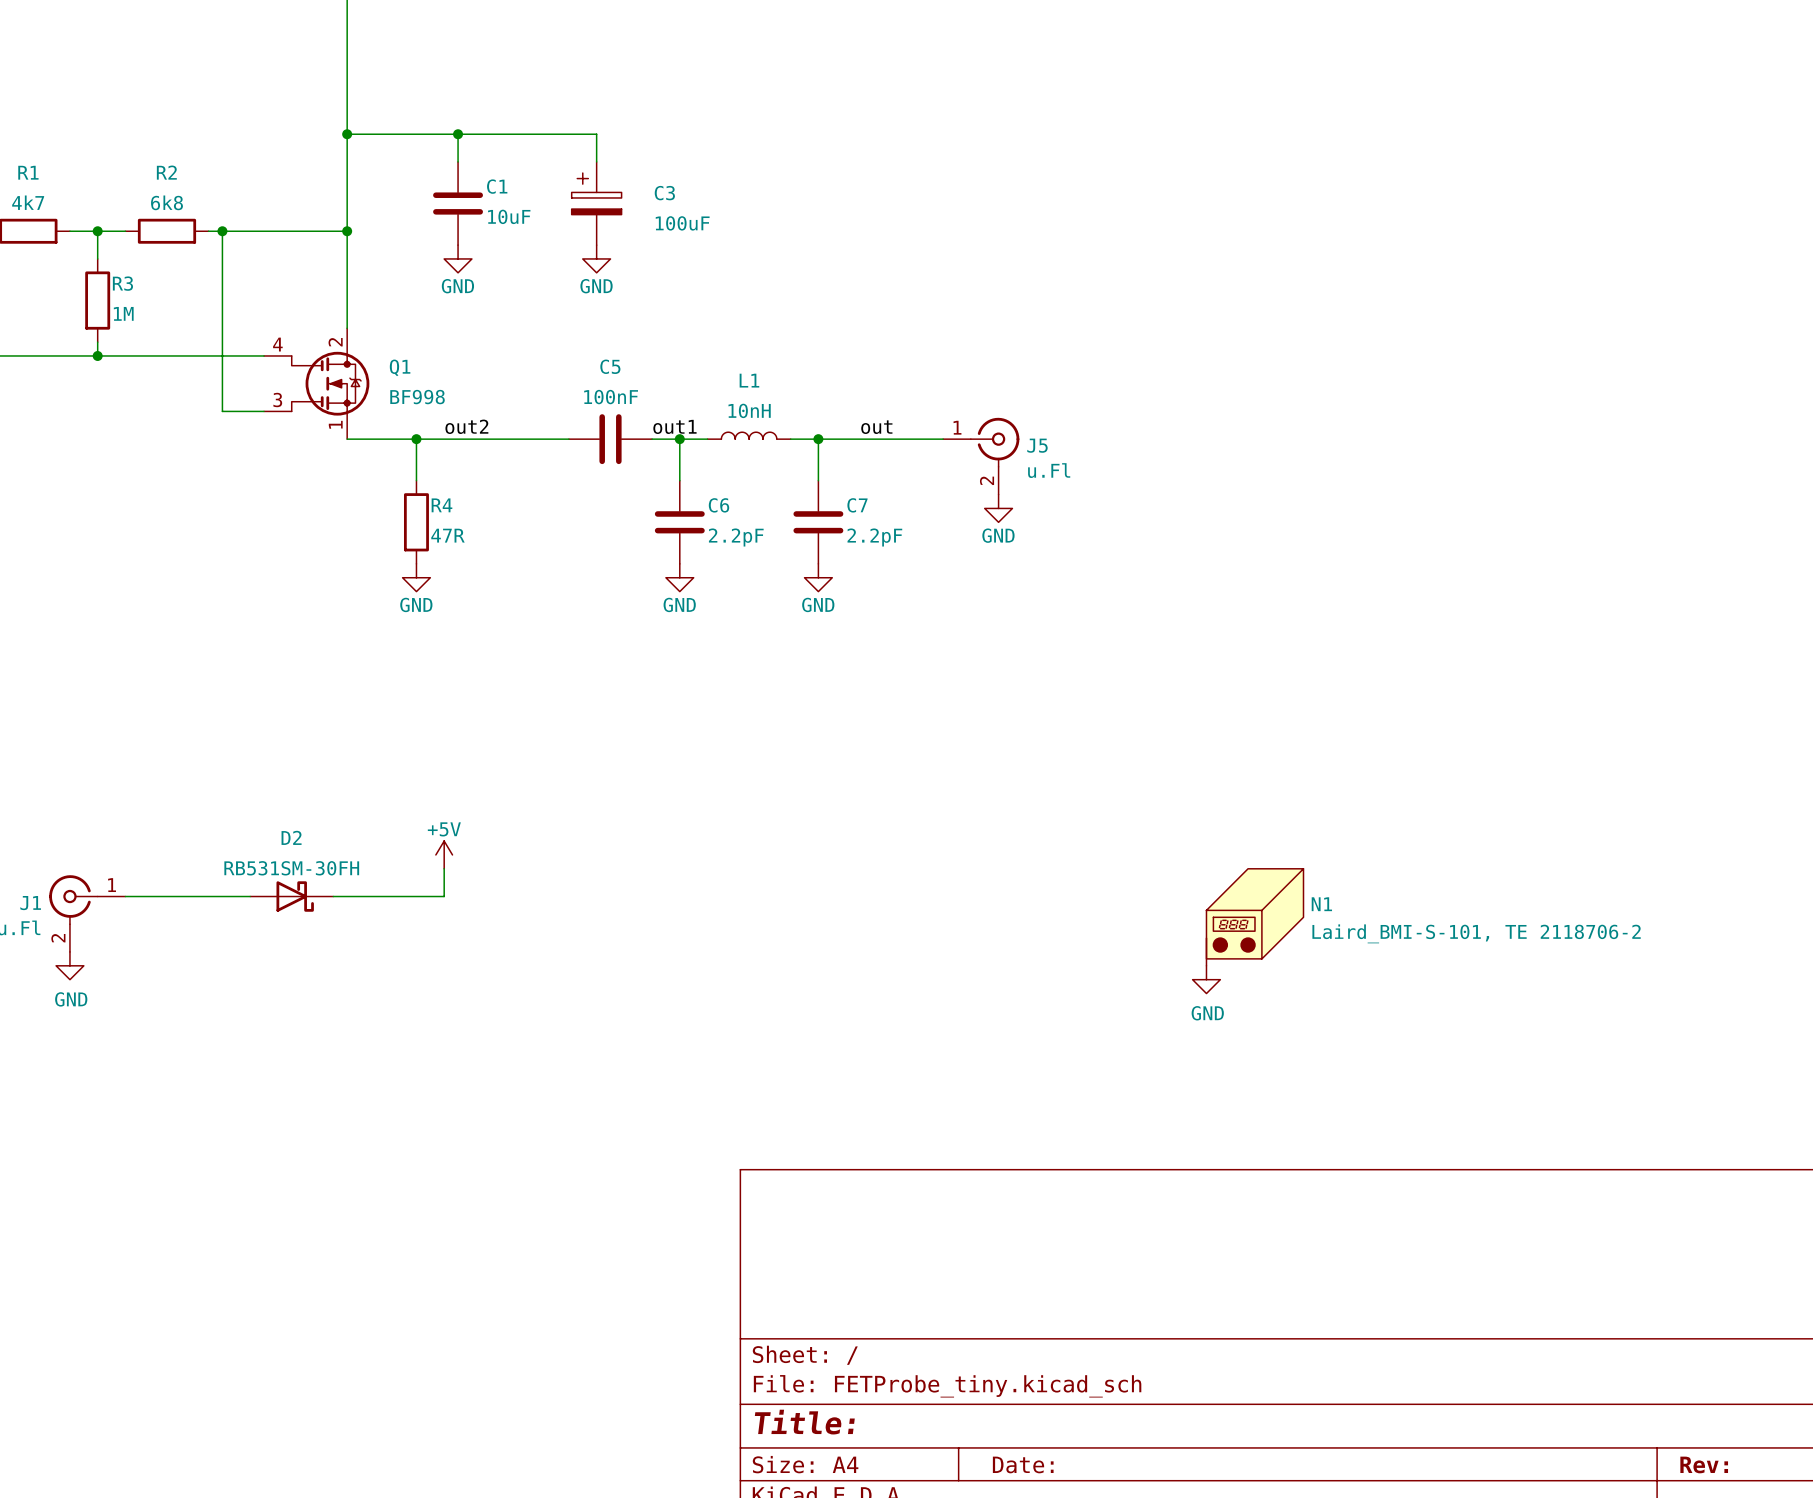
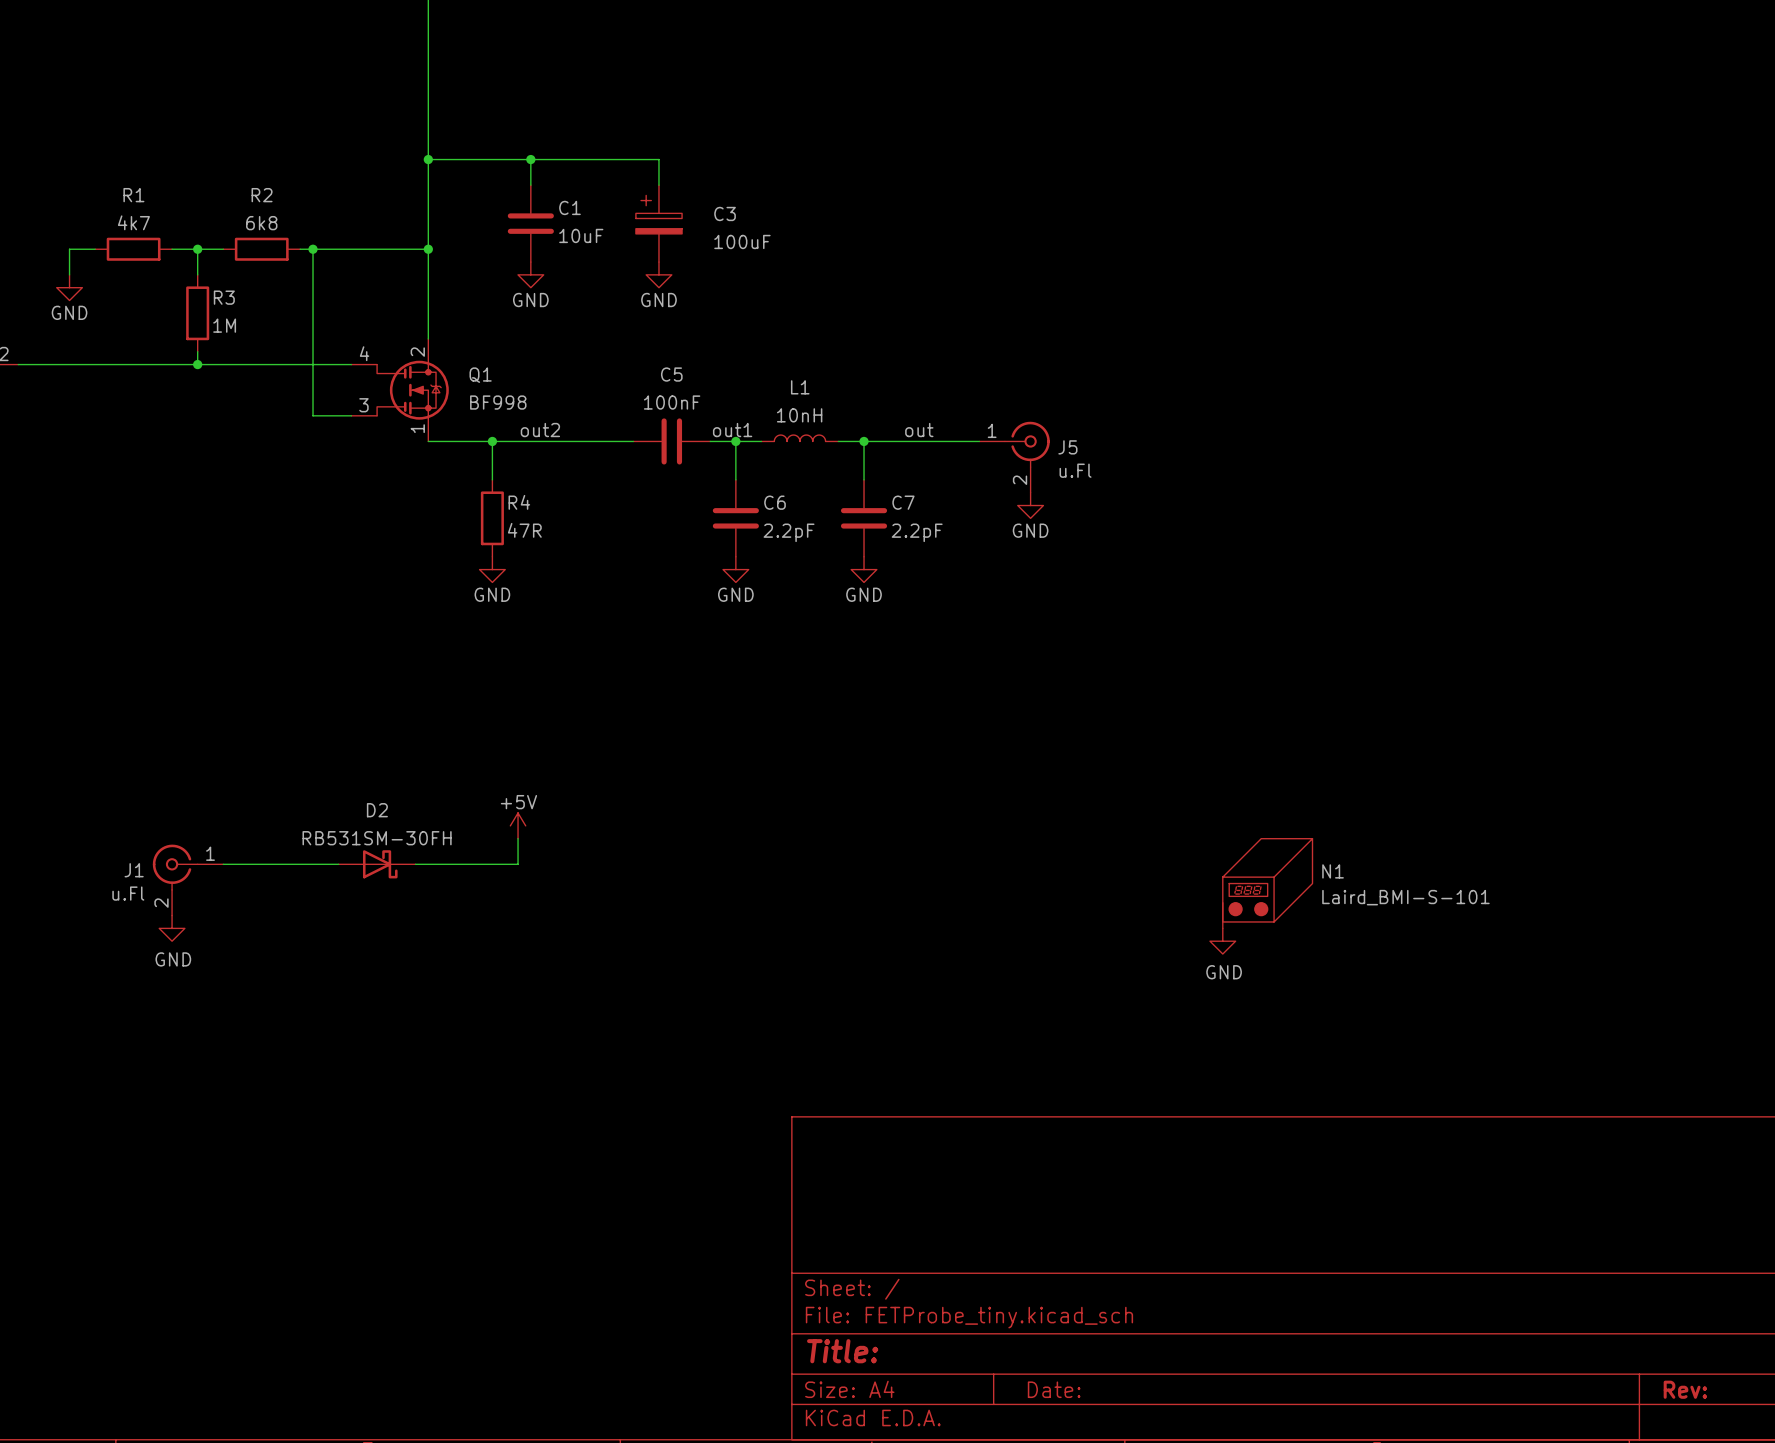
N1 value: Laird_BMI-S-101, TE 2118706-2 (1476, 933) -> Laird_BMI-S-101 (1405, 897)

